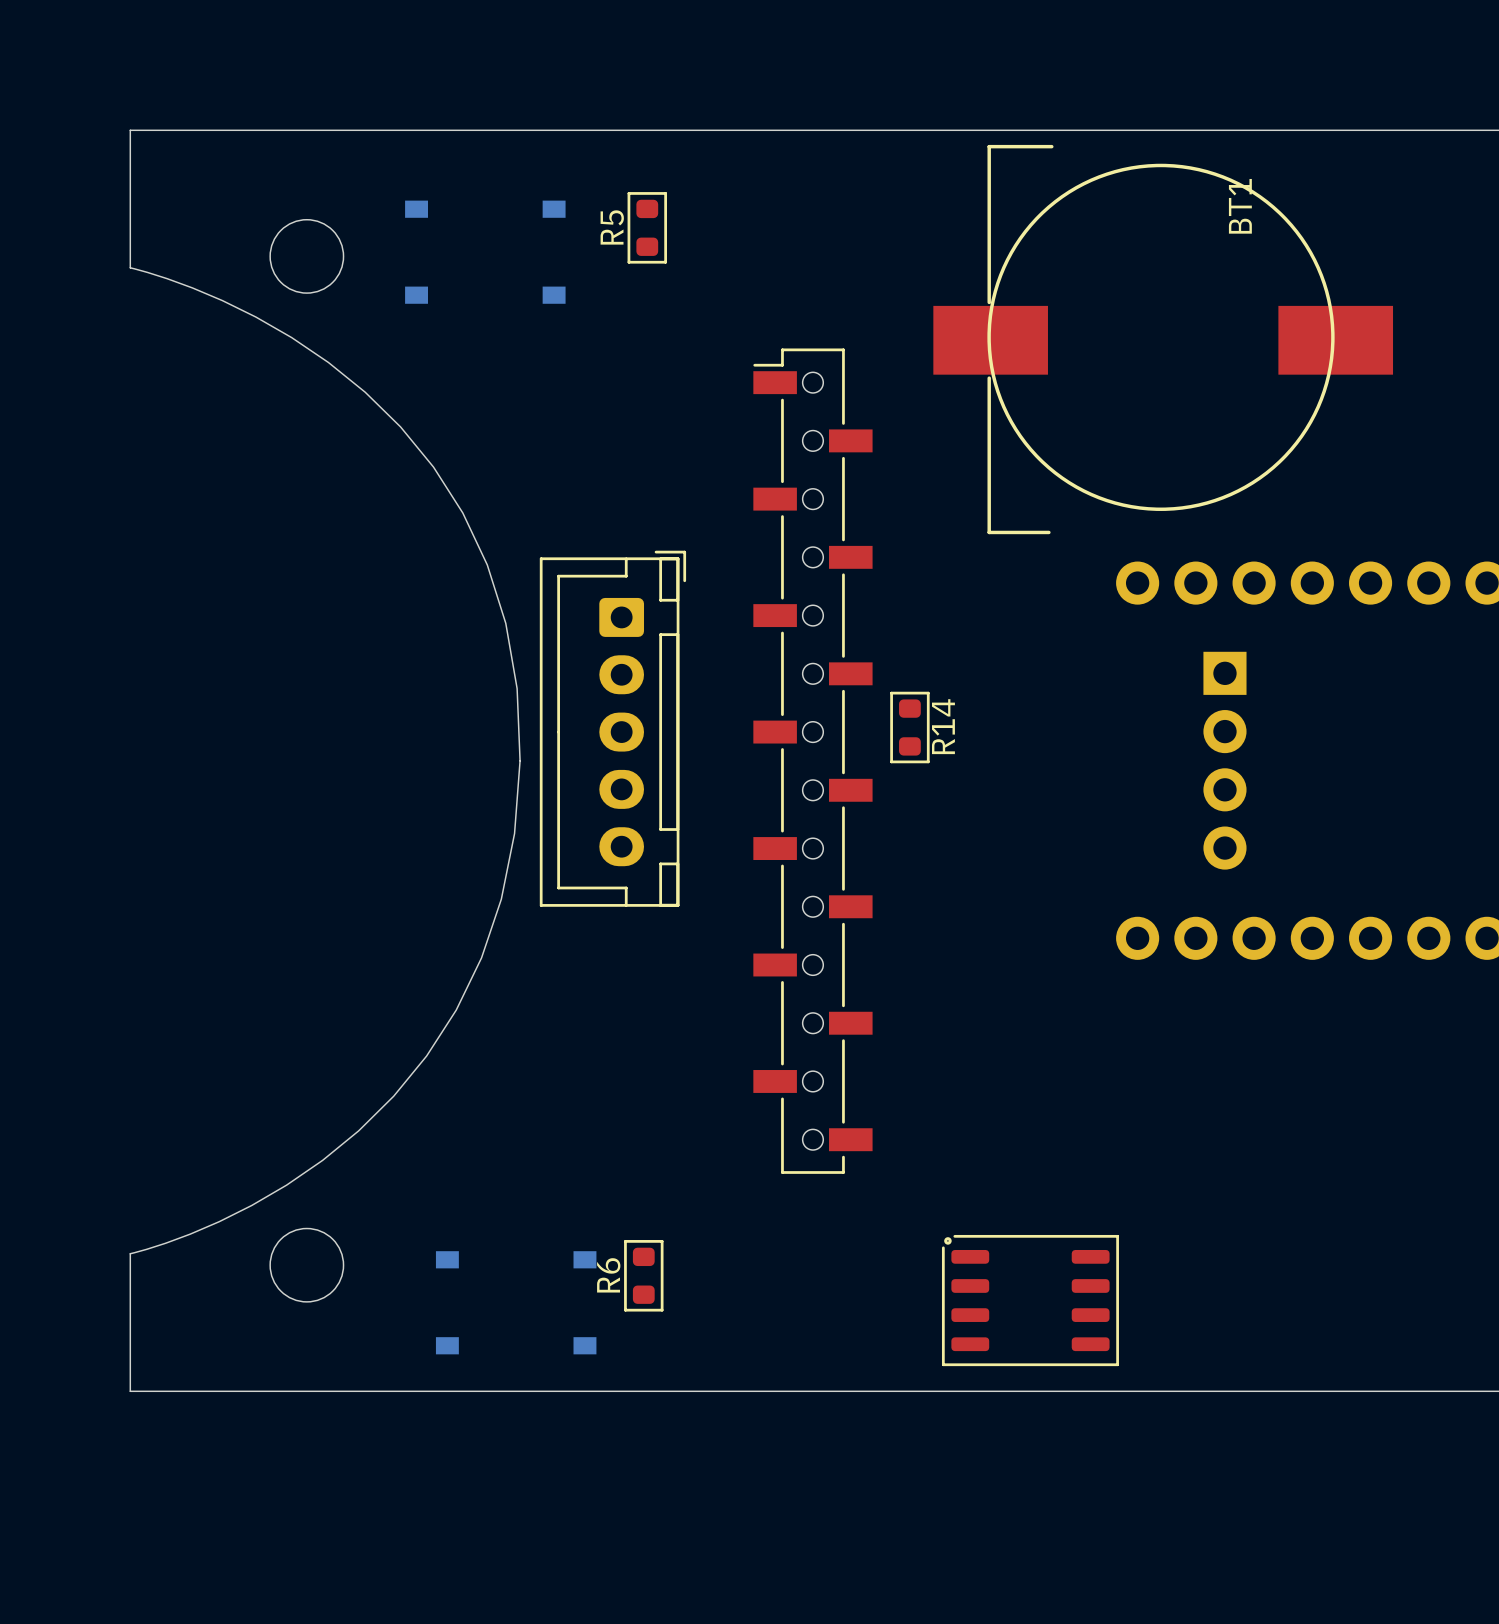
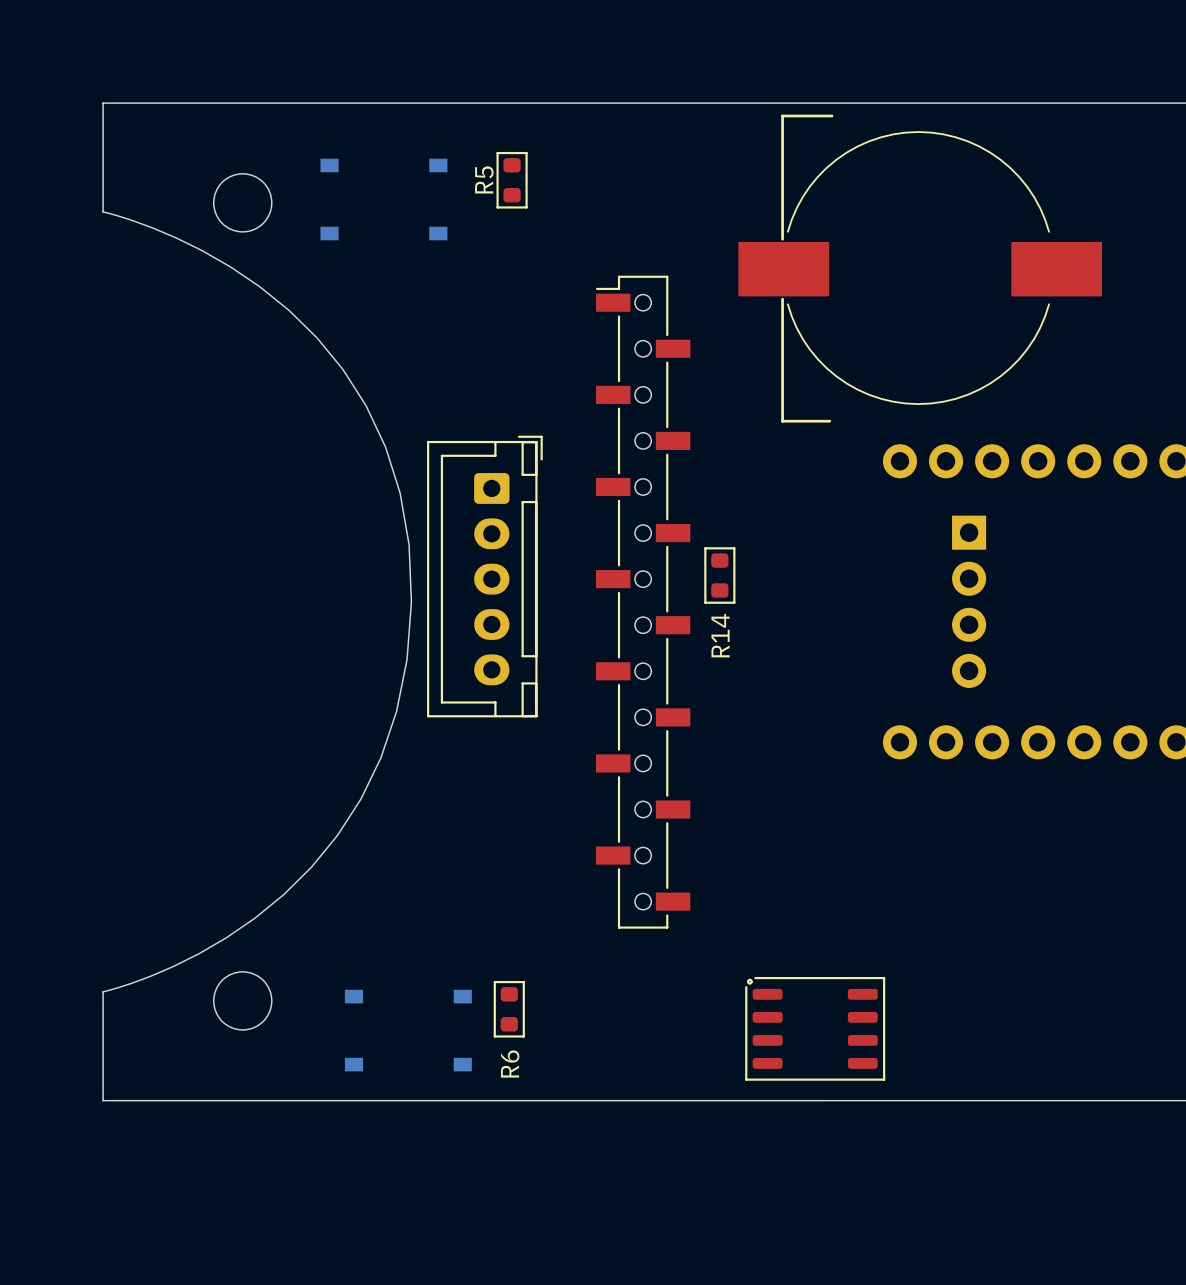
BT1: (1163, 339) -> none
part: none -> (920, 268)
R14 name position: R14 (943, 726) -> R14 (720, 635)
R6 name position: R6 (608, 1275) -> R6 (510, 1064)

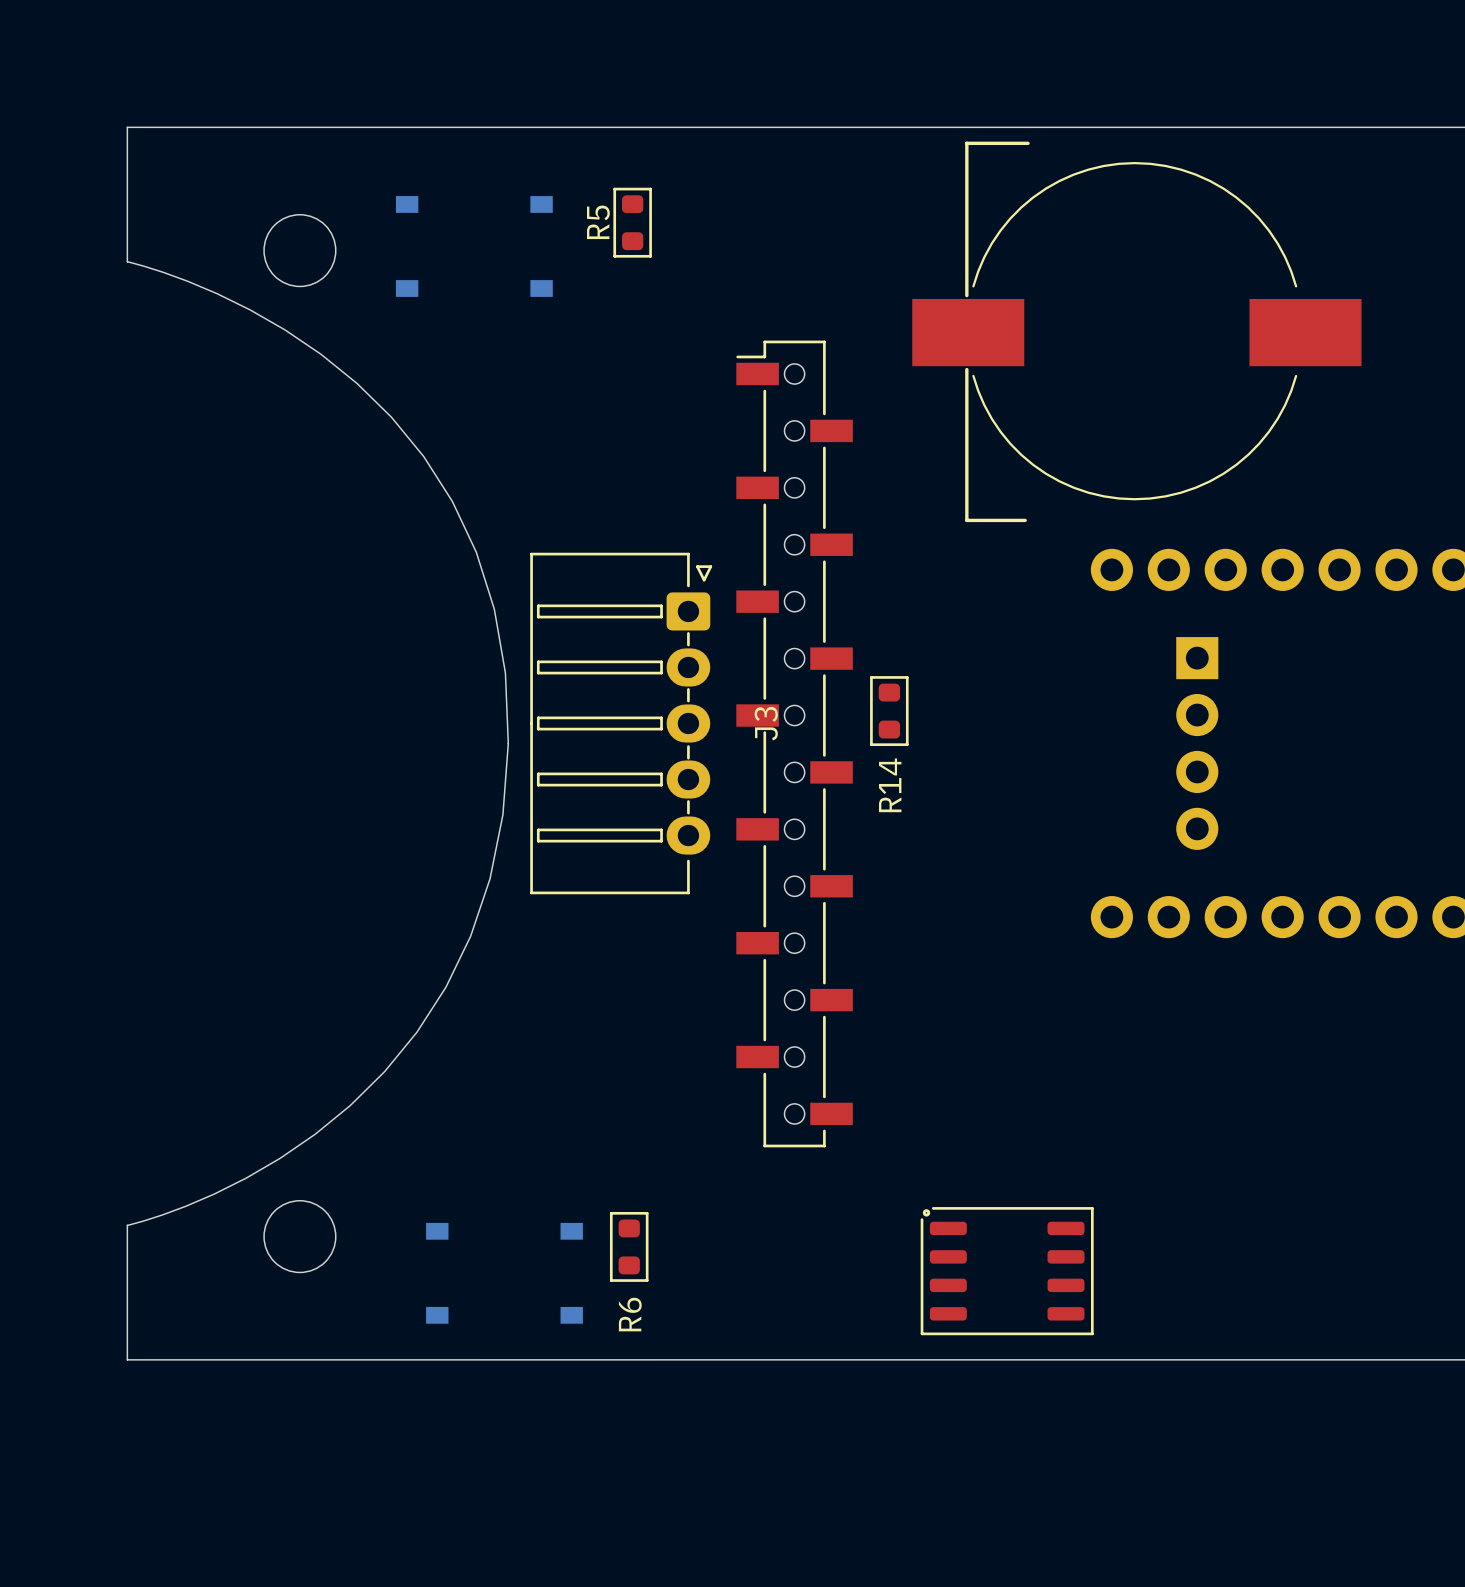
part: (484, 576) -> none
J3: none -> (621, 723)

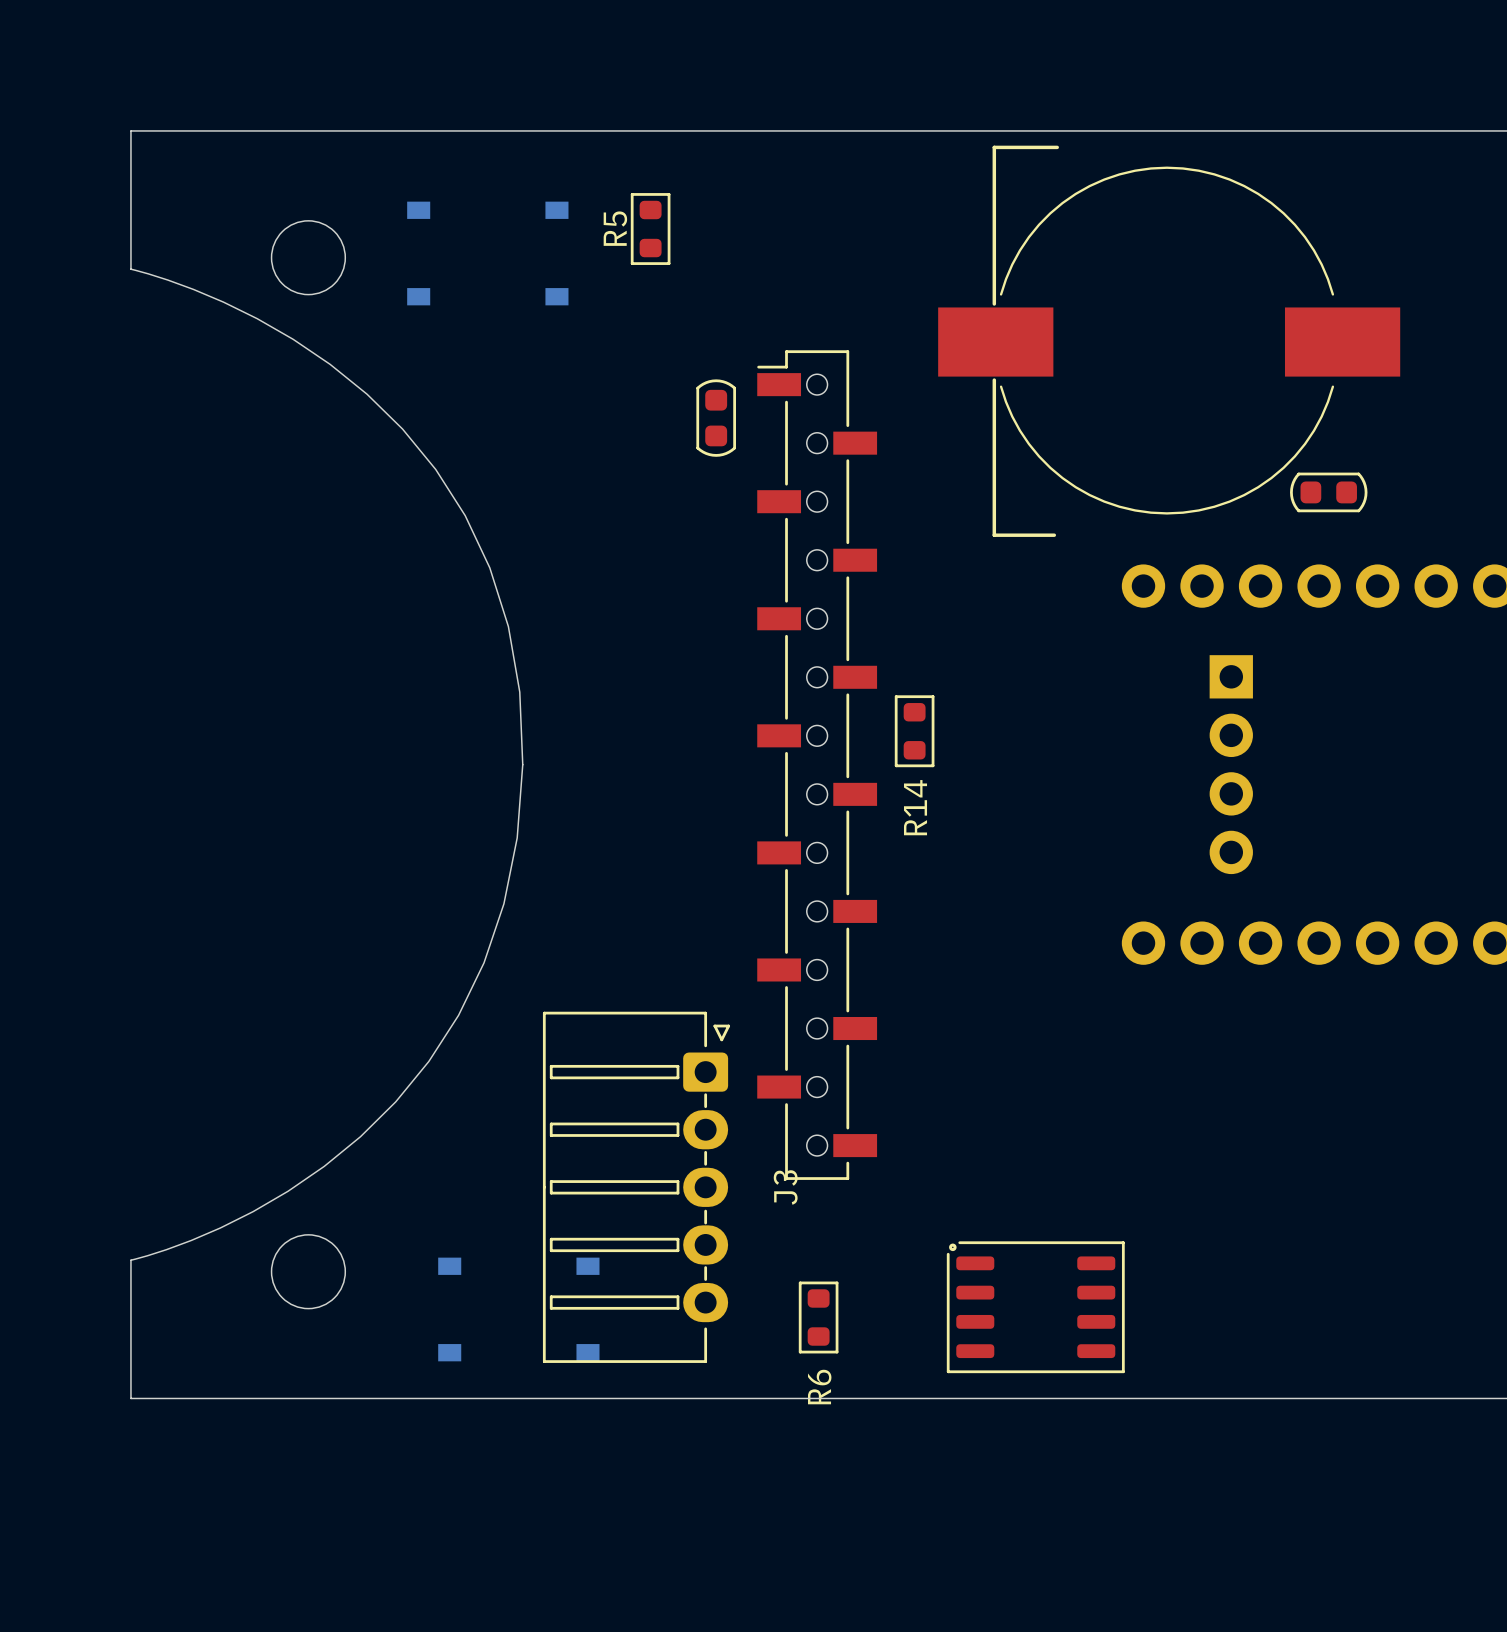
part: none -> (716, 418)
part: none -> (1328, 492)
J3 position: (621, 723) -> (636, 1187)
R6 position: (629, 1246) -> (818, 1317)

